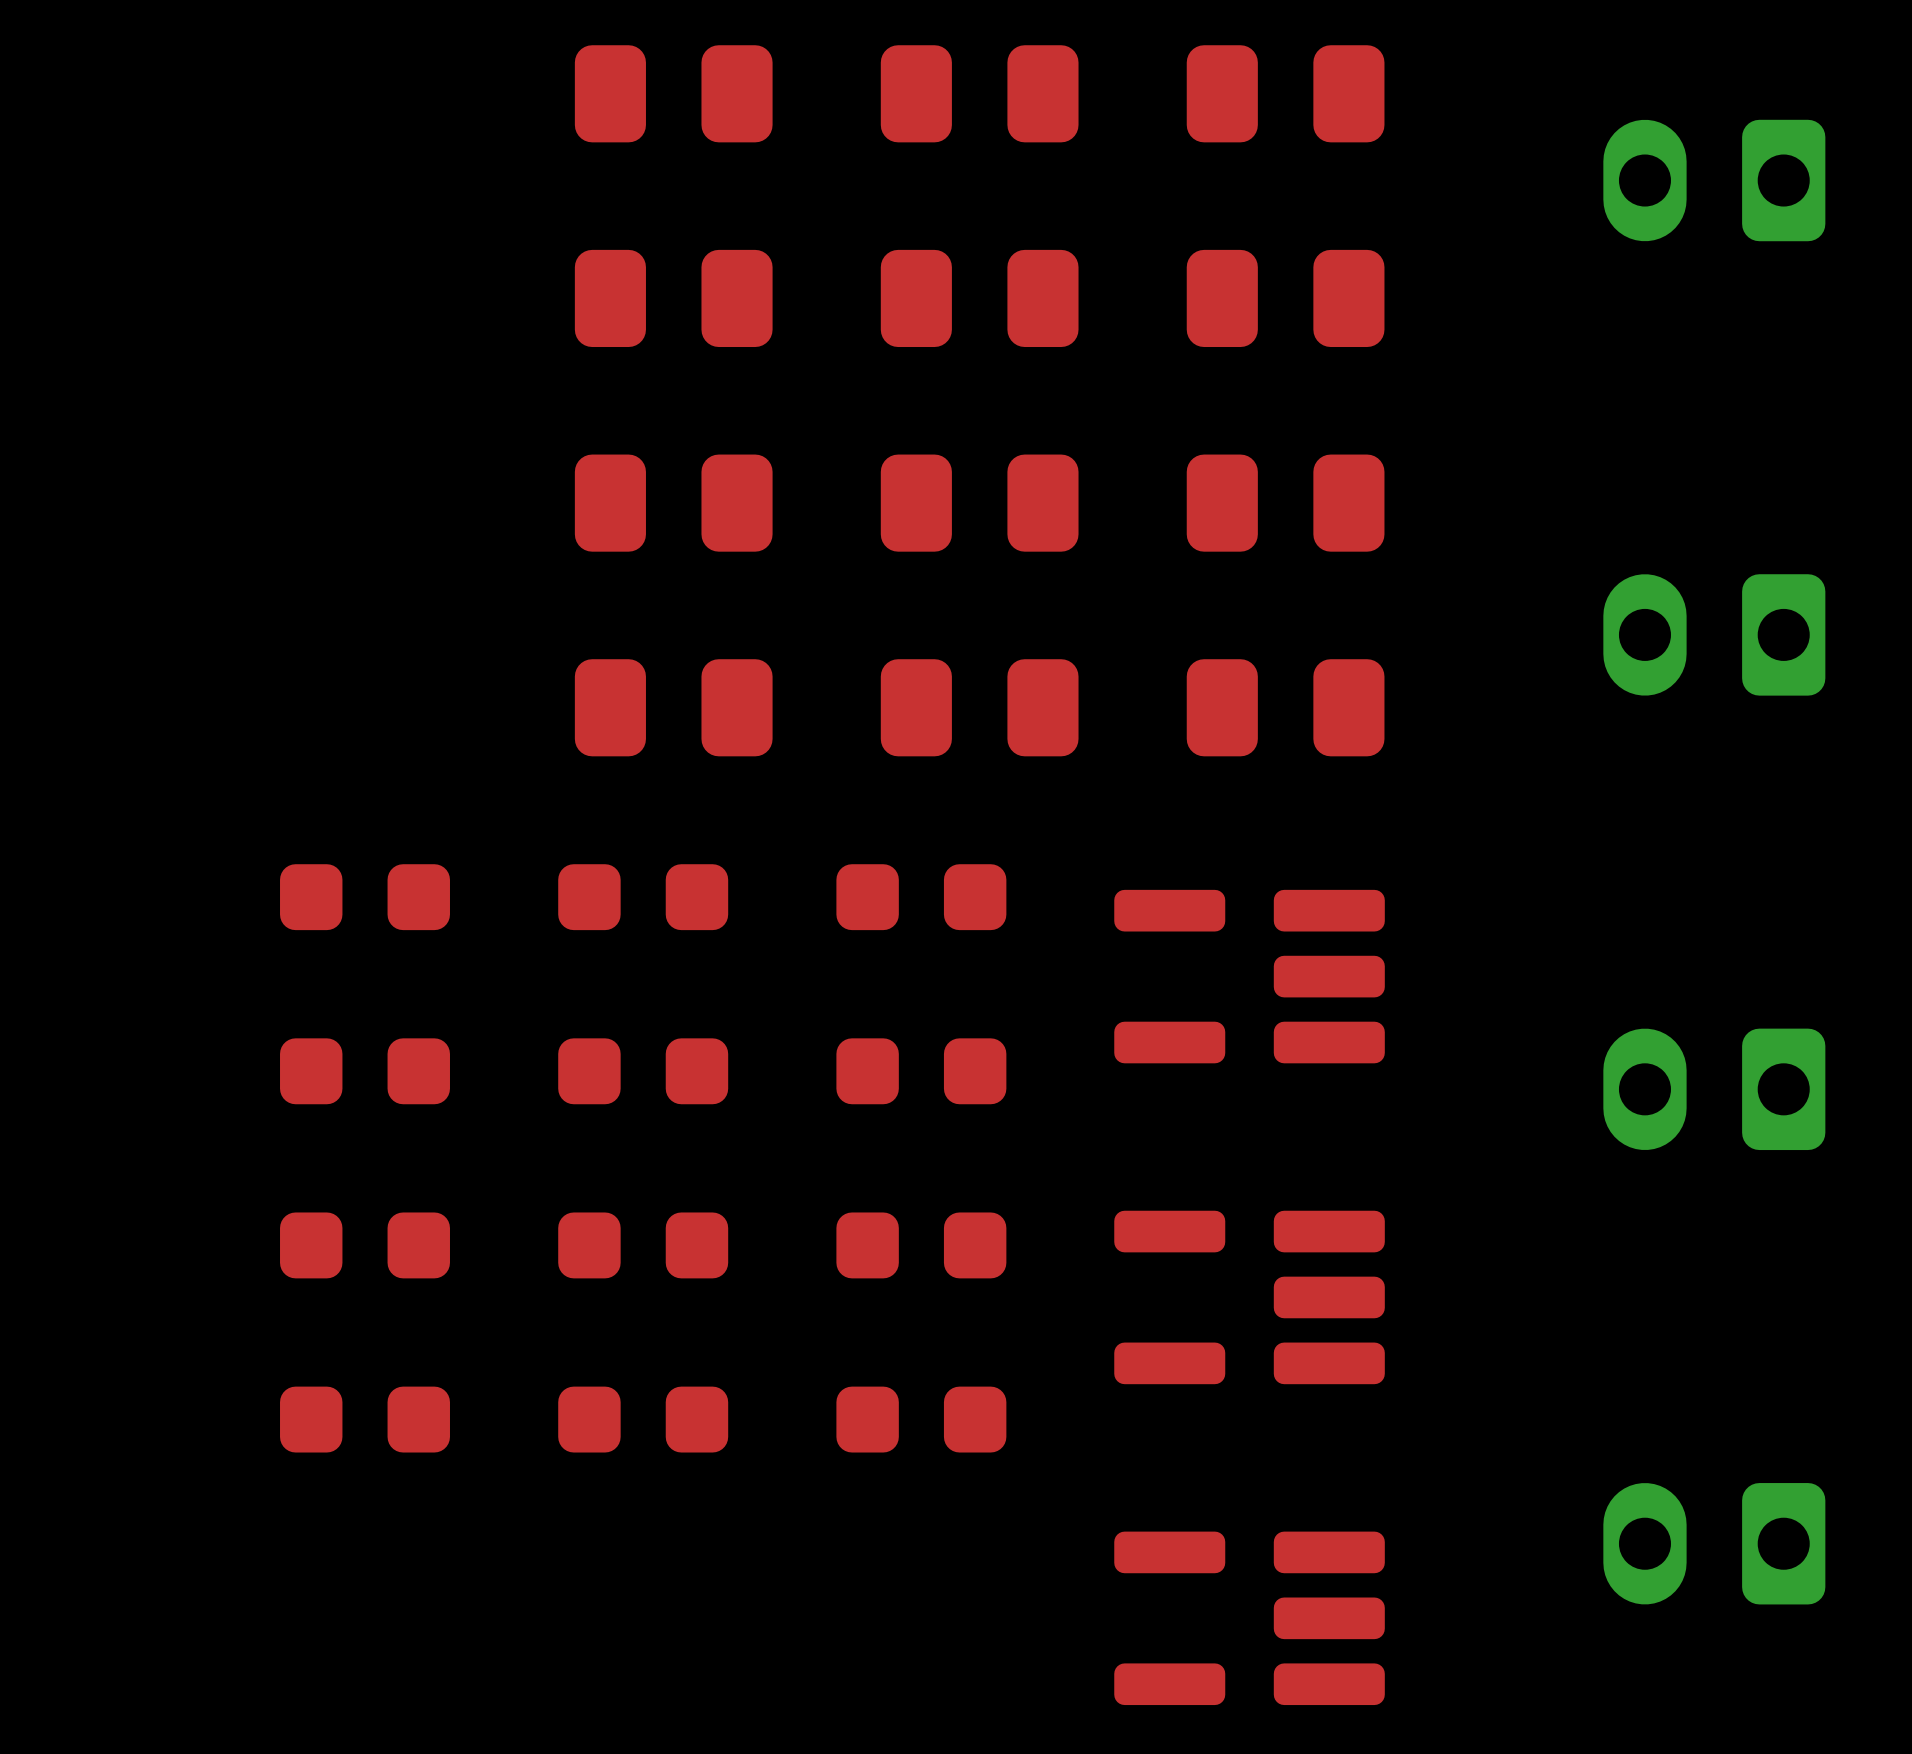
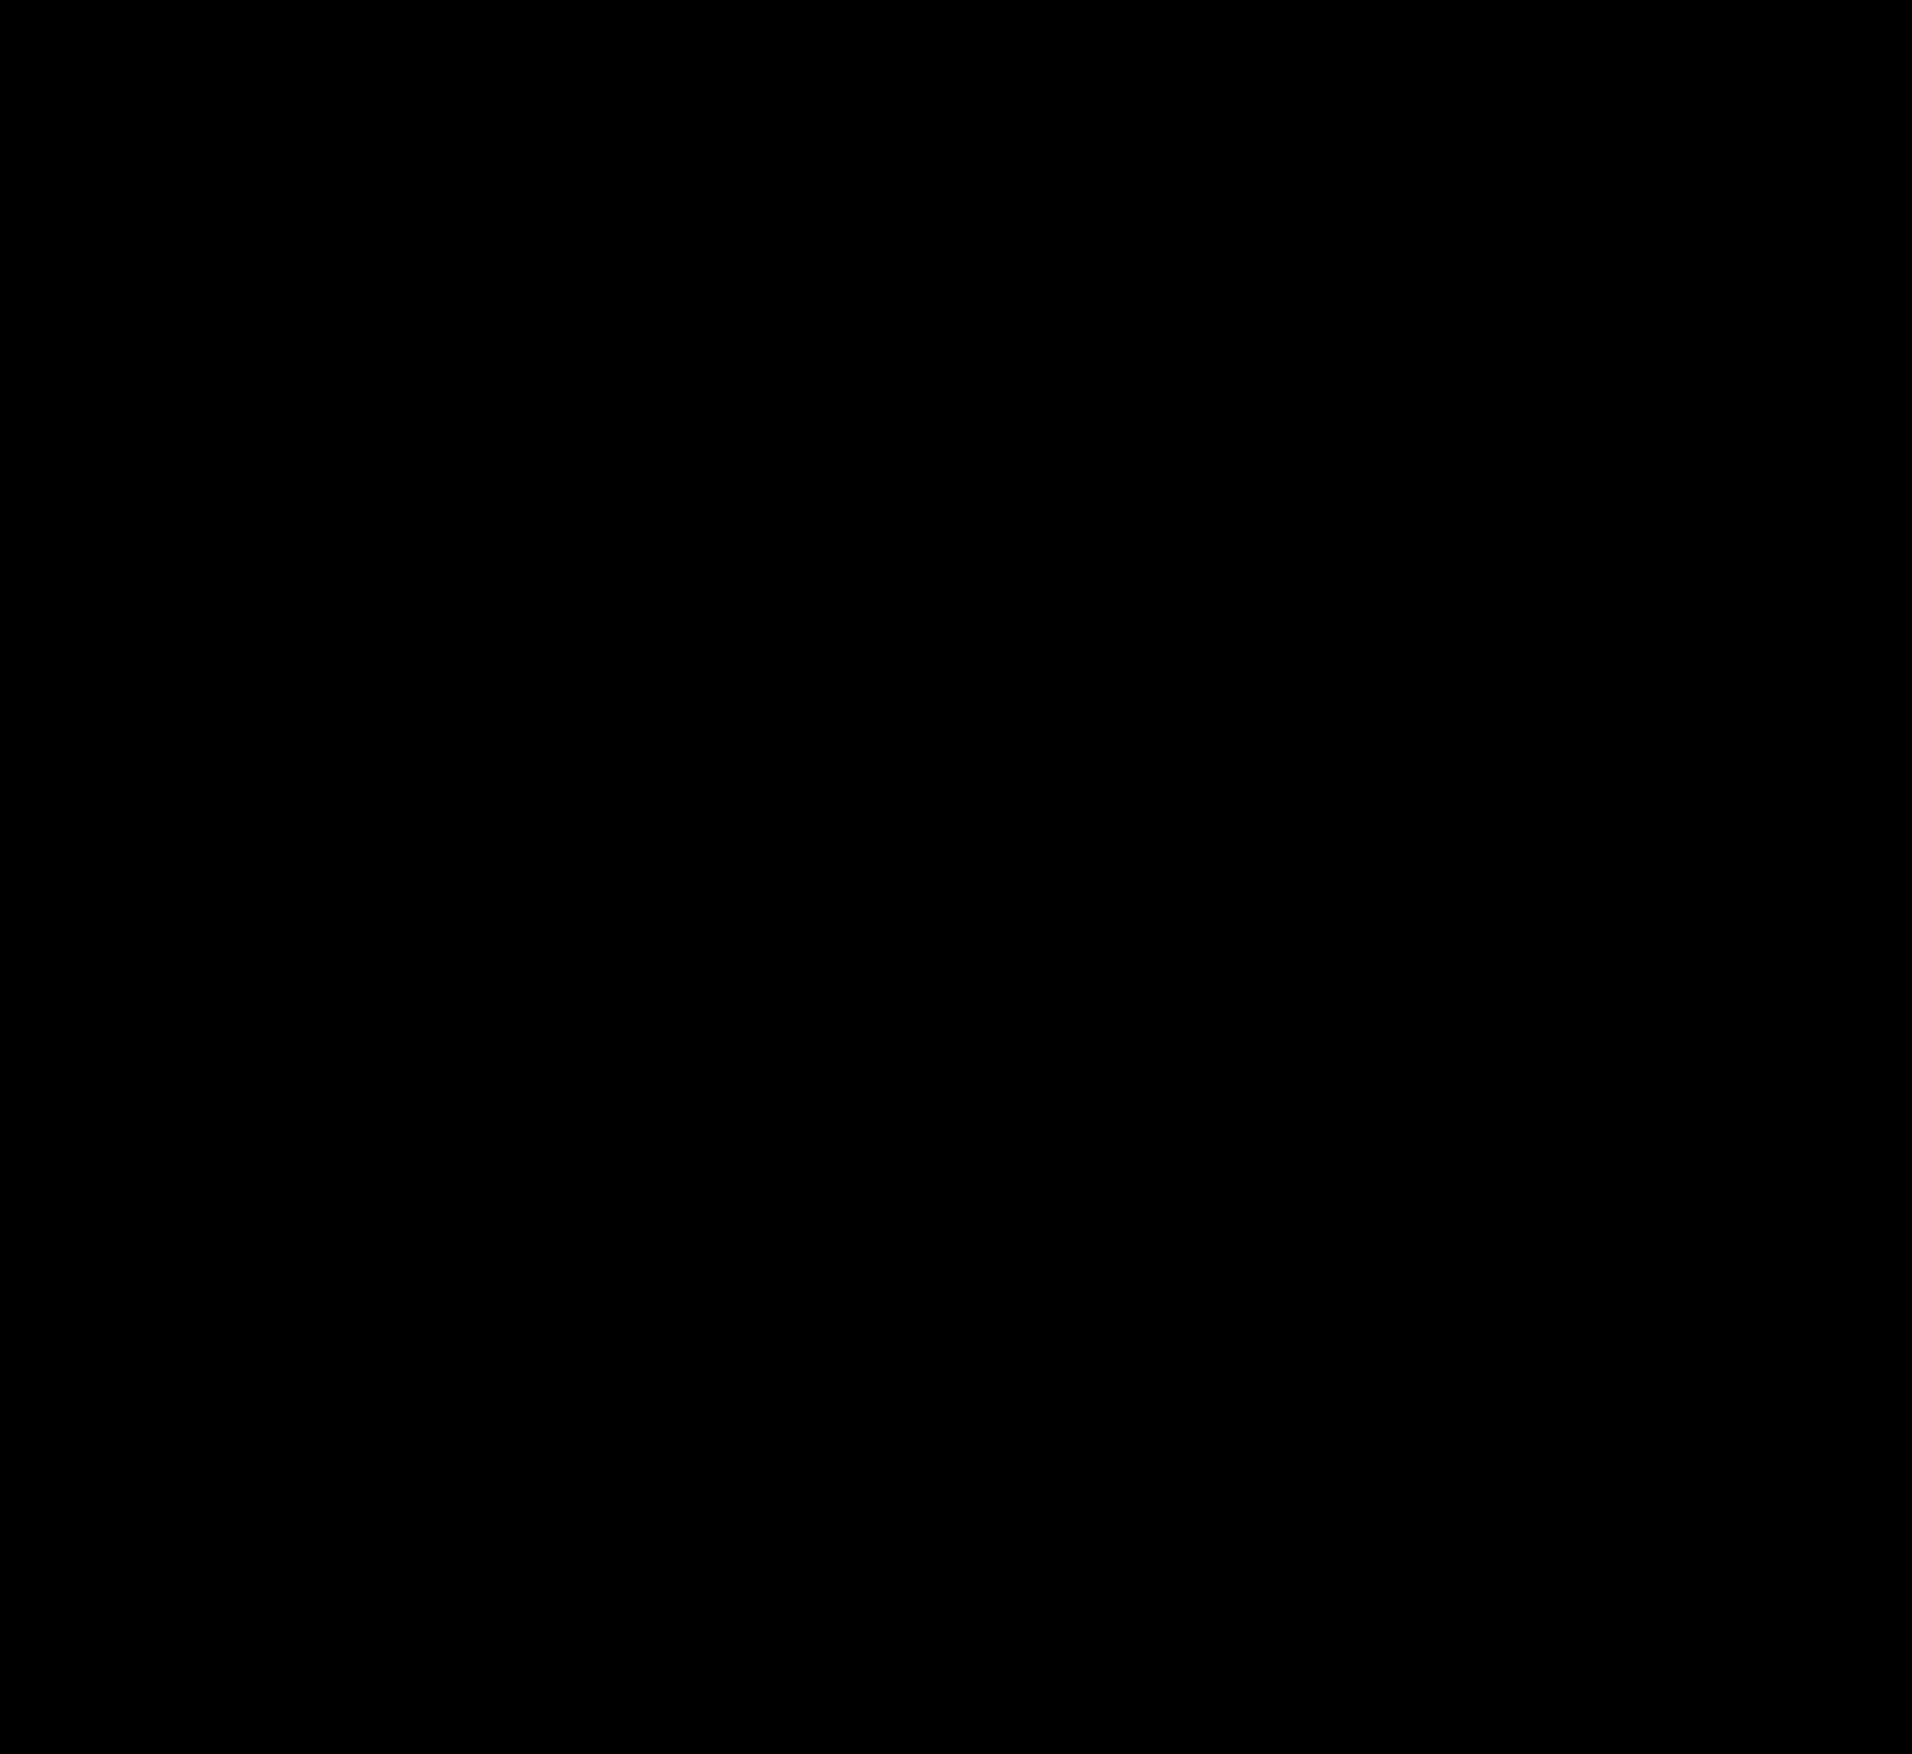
part: (673, 93) -> none
part: (979, 93) -> none
part: (1285, 93) -> none
part: (1714, 180) -> none
part: (673, 298) -> none
part: (979, 298) -> none
part: (1285, 298) -> none
part: (673, 503) -> none
part: (979, 503) -> none
part: (1285, 503) -> none
part: (1714, 634) -> none
part: (673, 707) -> none
part: (979, 707) -> none
part: (1285, 707) -> none
part: (365, 897) -> none
part: (643, 897) -> none
part: (921, 897) -> none
part: (1249, 976) -> none
part: (365, 1071) -> none
part: (643, 1071) -> none
part: (921, 1071) -> none
part: (1714, 1089) -> none
part: (365, 1245) -> none
part: (643, 1245) -> none
part: (921, 1245) -> none
part: (1249, 1297) -> none
part: (365, 1419) -> none
part: (643, 1419) -> none
part: (921, 1419) -> none
part: (1714, 1543) -> none
part: (1249, 1618) -> none

